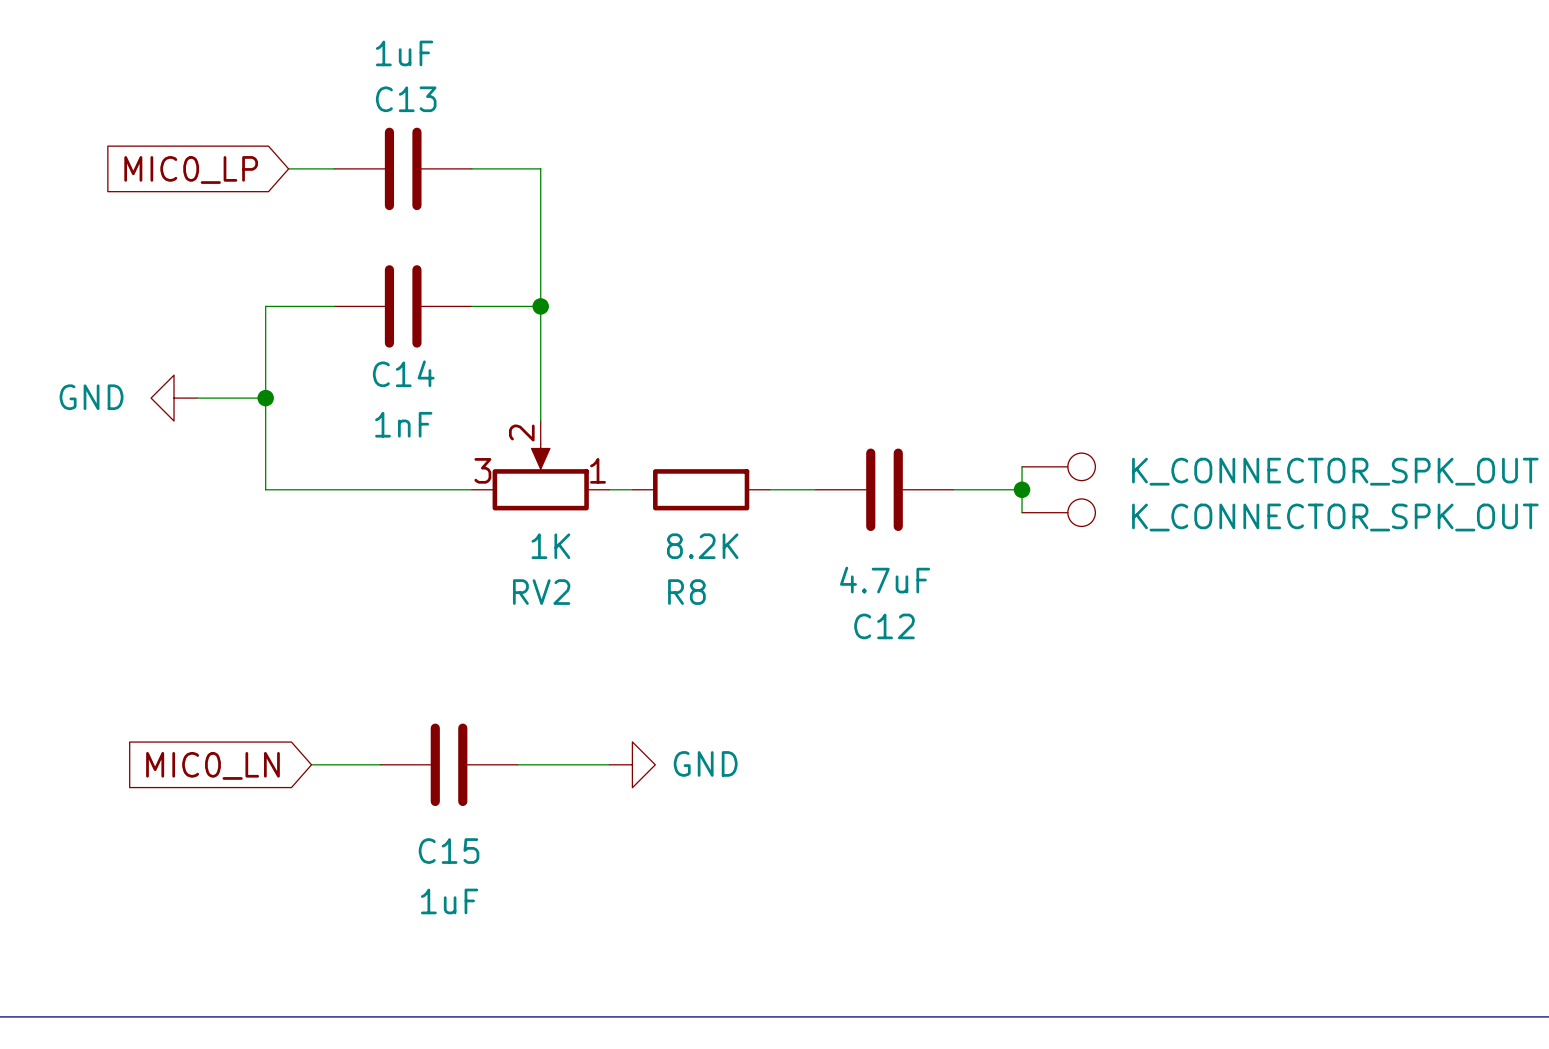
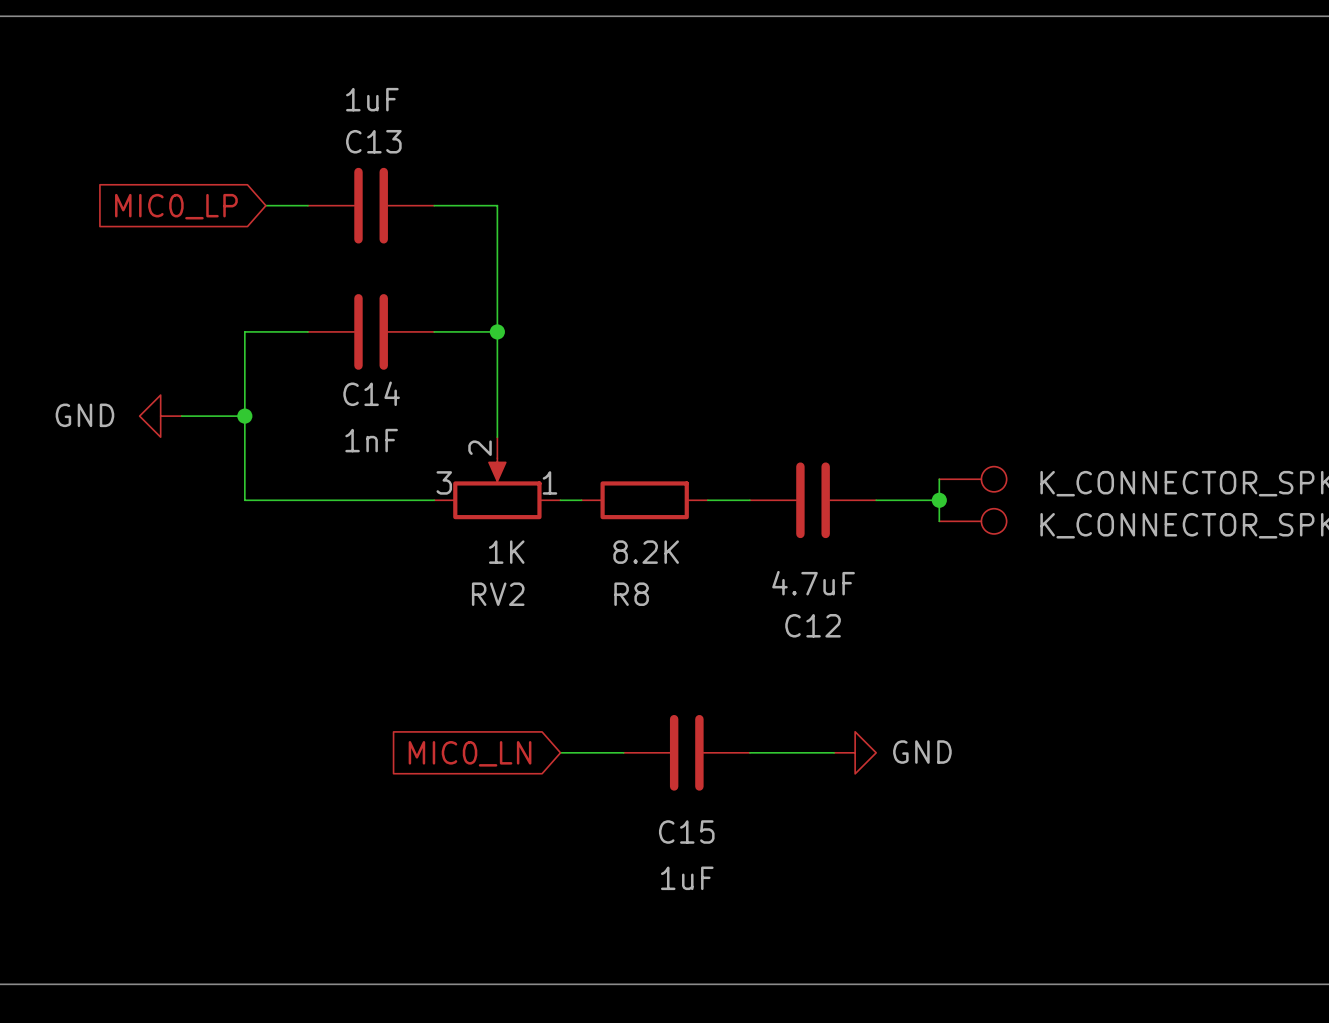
wire: (311, 764) (380, 764) -> none
C15 position: (449, 764) -> (686, 752)
wire: (517, 764) (609, 764) -> (623, 752) (560, 752)
power symbol position: GND (632, 764) -> GND (855, 752)
wire: none -> (749, 752) (834, 752)
global label position: MIC0_LN (212, 765) -> MIC0_LN (470, 753)

